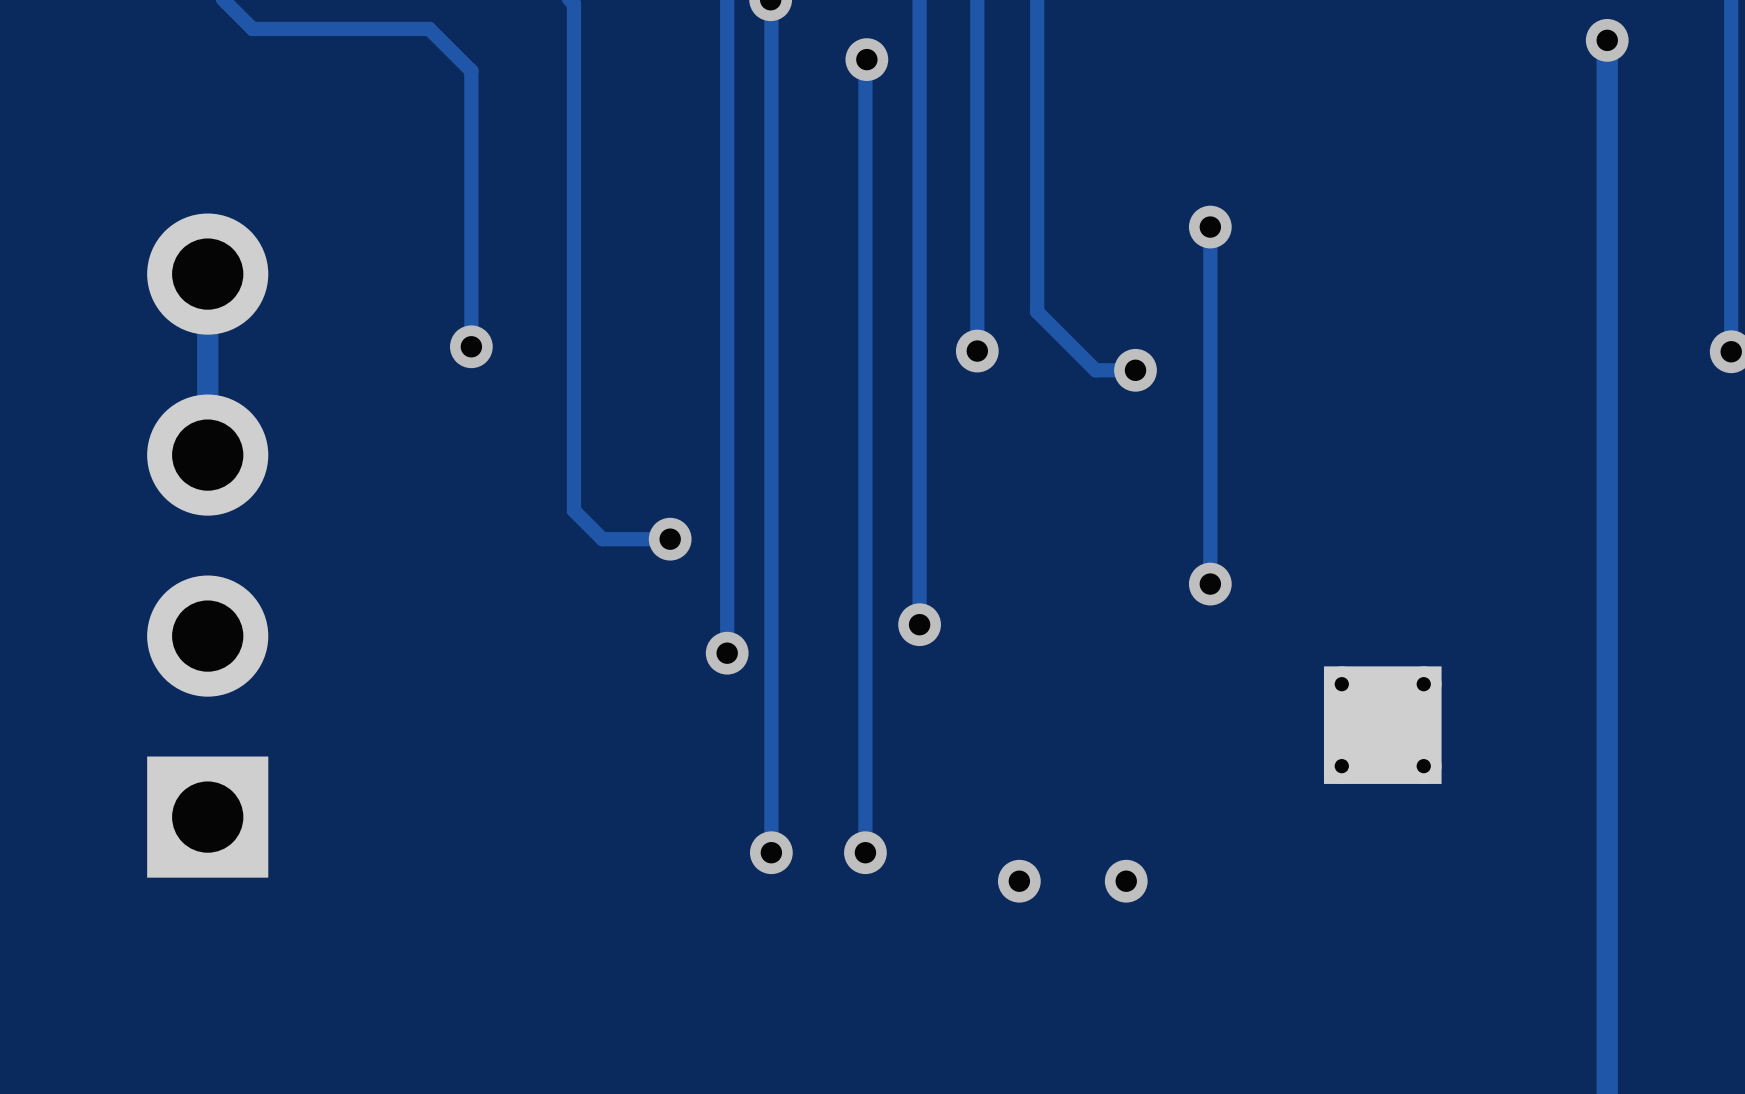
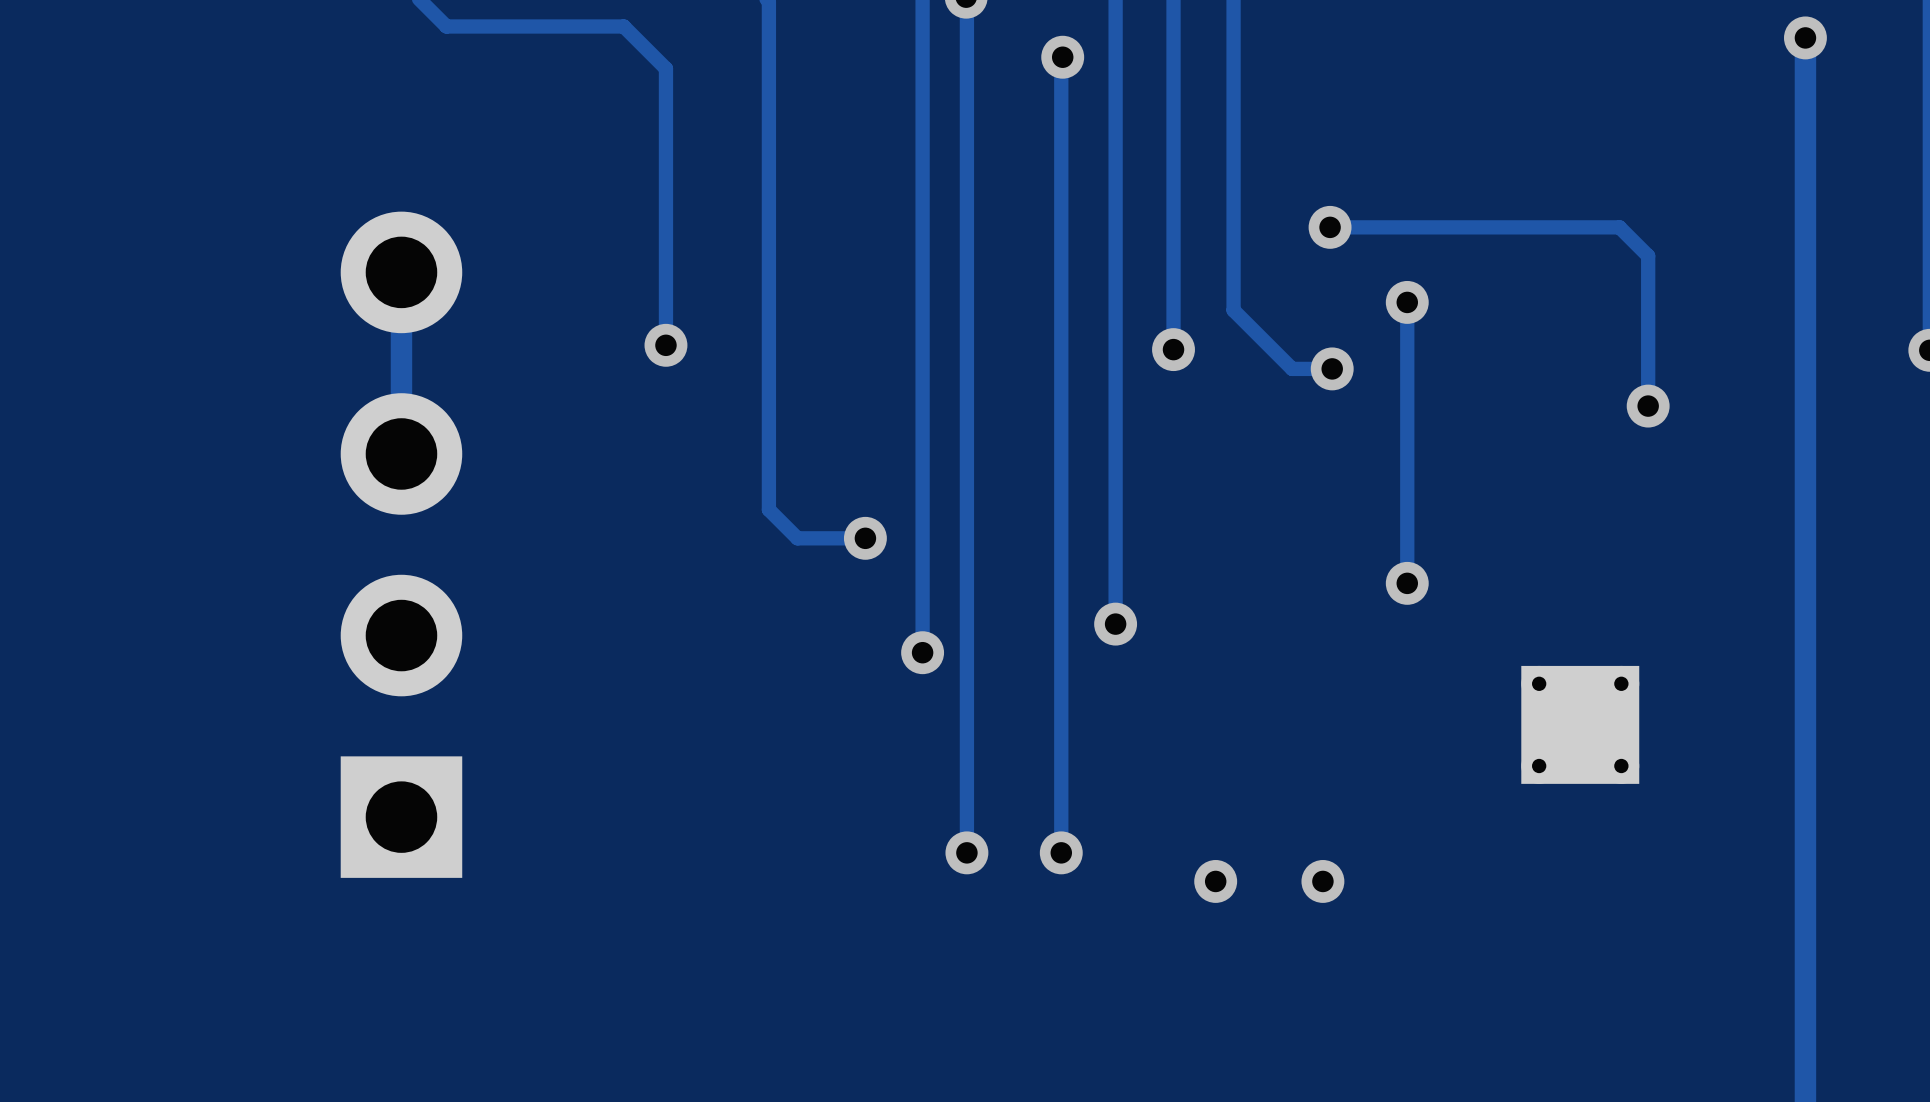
track: (1210, 227) (1210, 304) -> none
via: (1210, 227) -> none
track: none -> (1330, 227) (1619, 227) (1648, 255) (1648, 406)
via: none -> (1330, 227)
via: none -> (1407, 302)
via: none -> (1648, 406)

